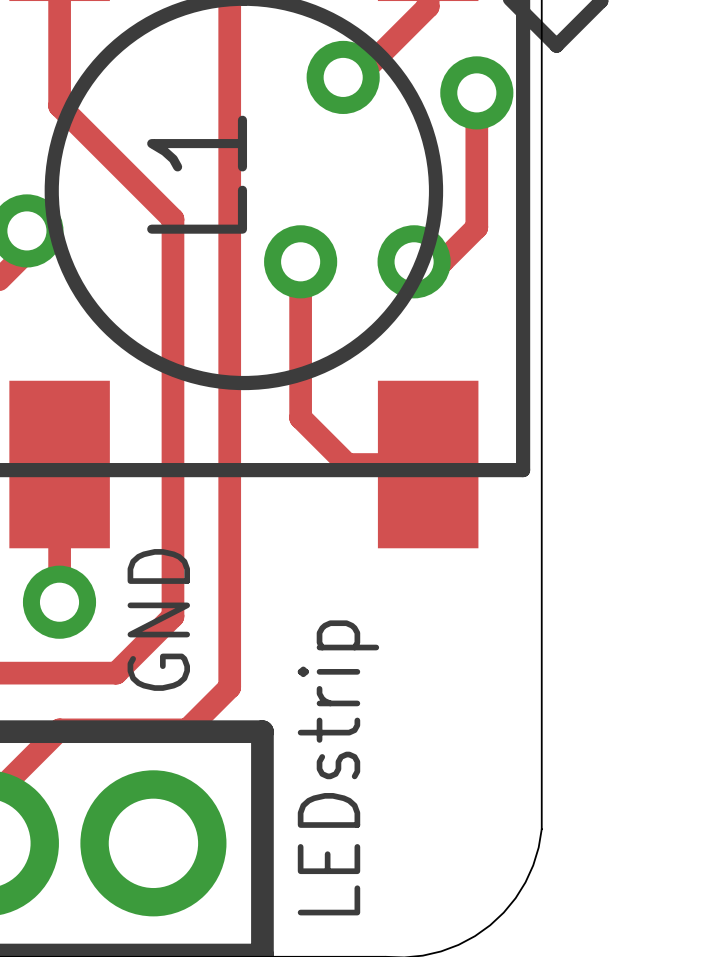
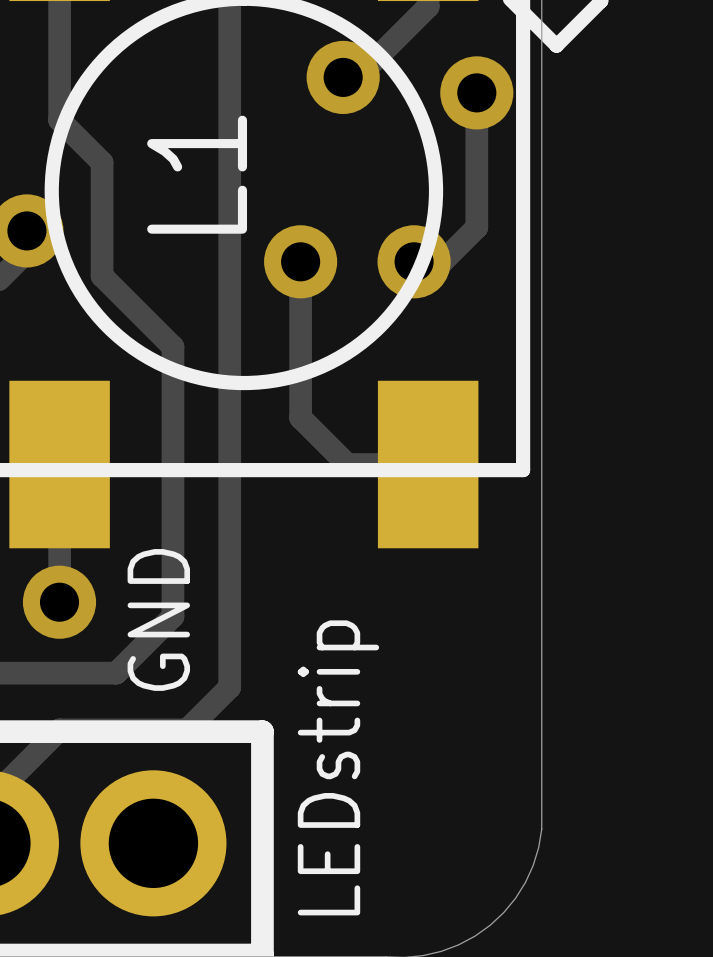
track: (59, 105) (172, 219) (172, 346) -> (59, 105) (59, 120) (102, 162) (102, 275) (172, 346)

